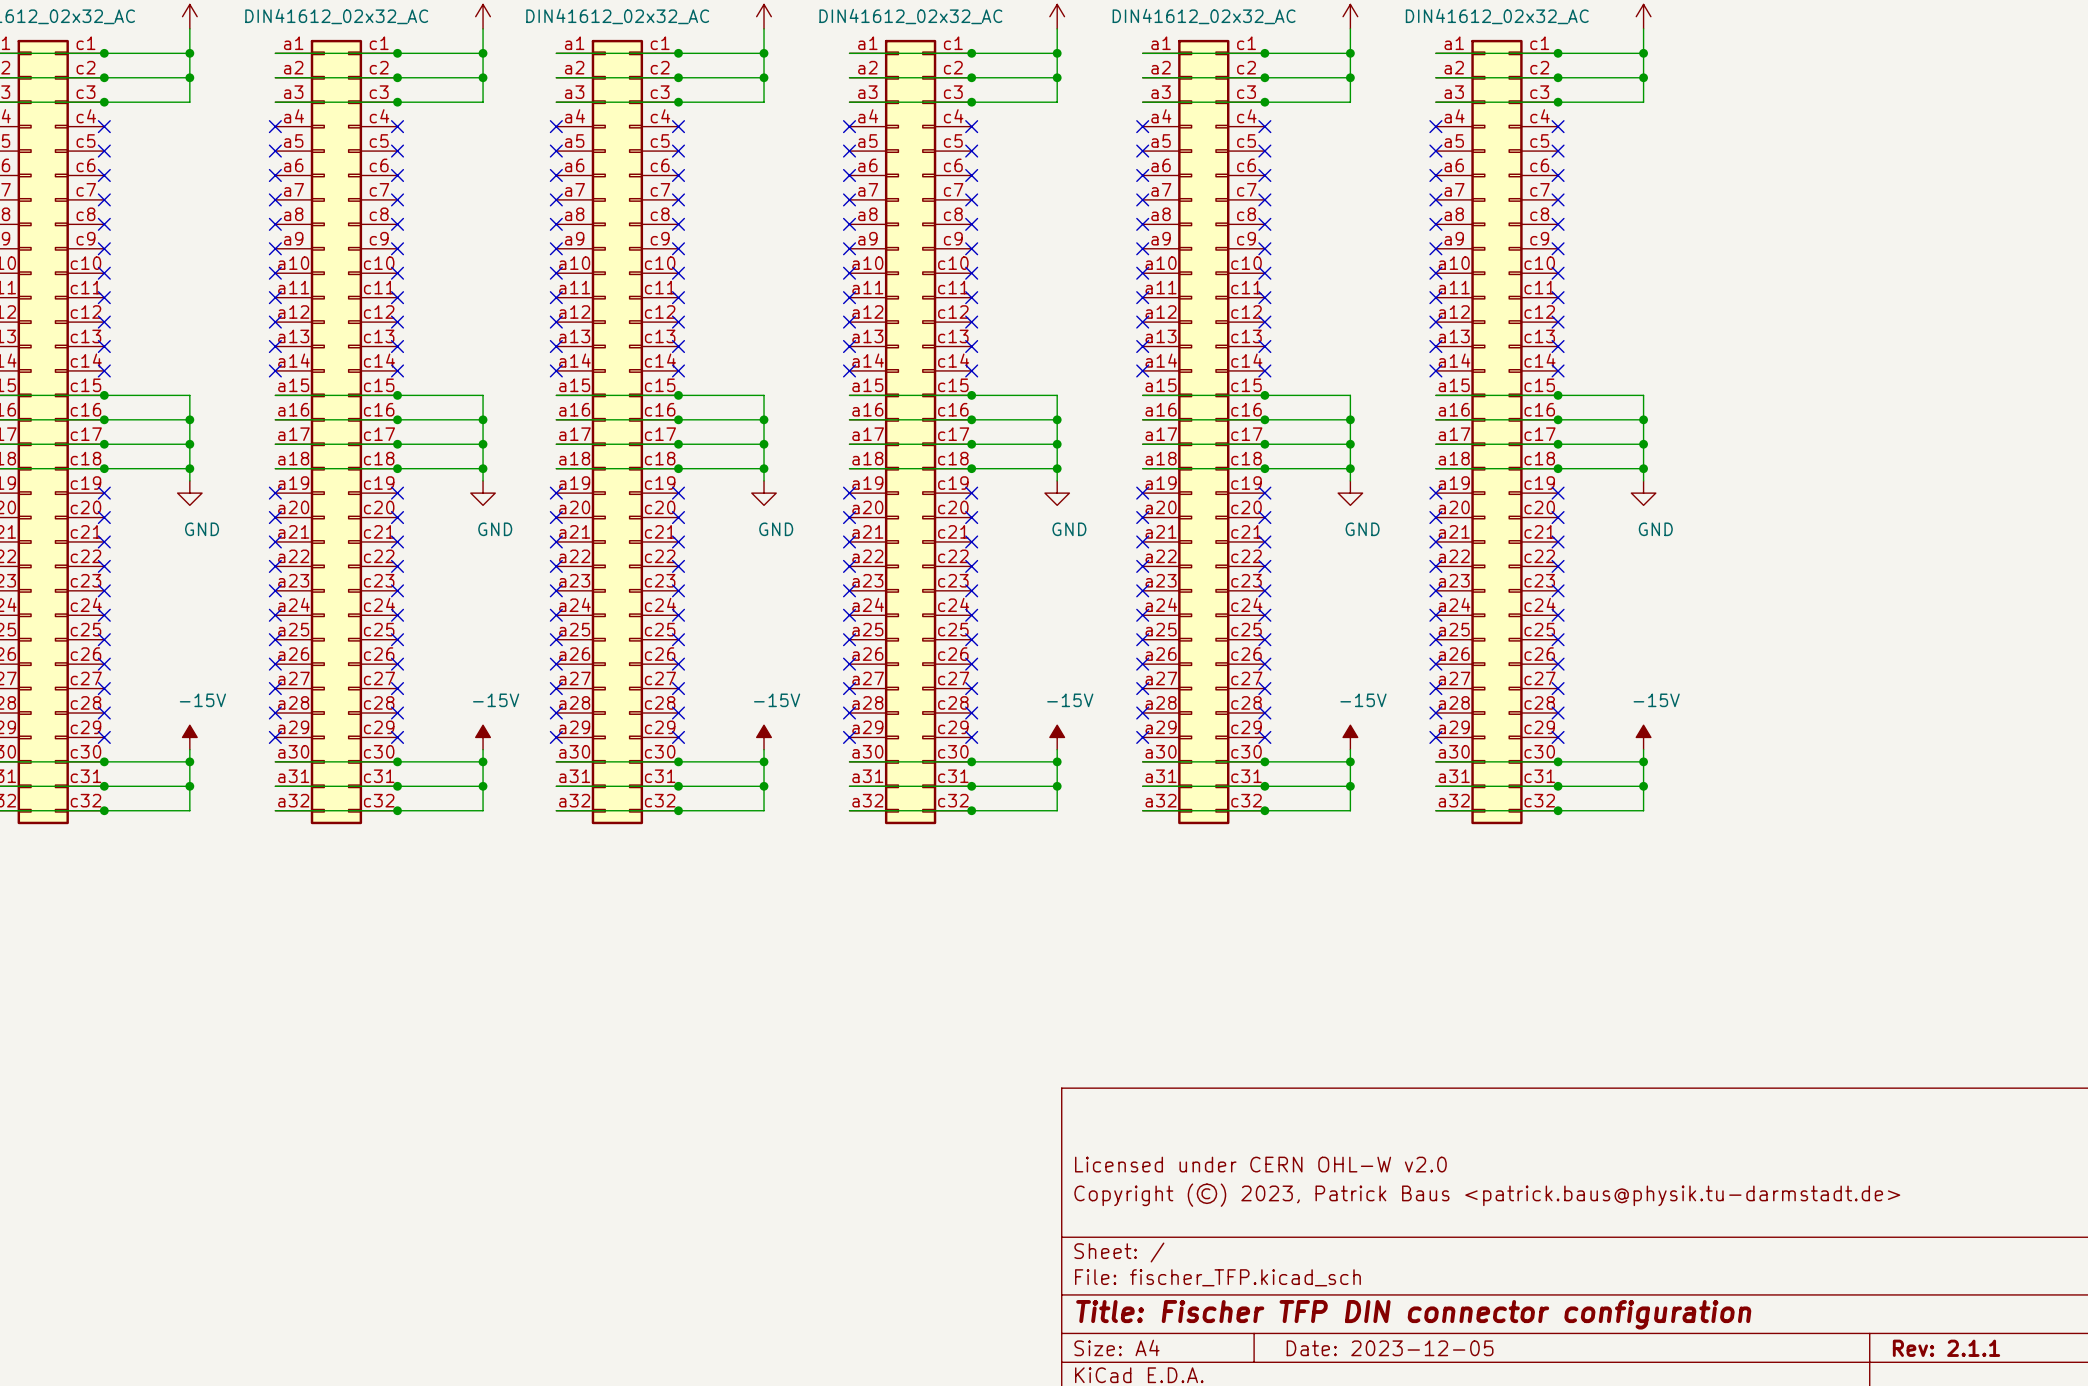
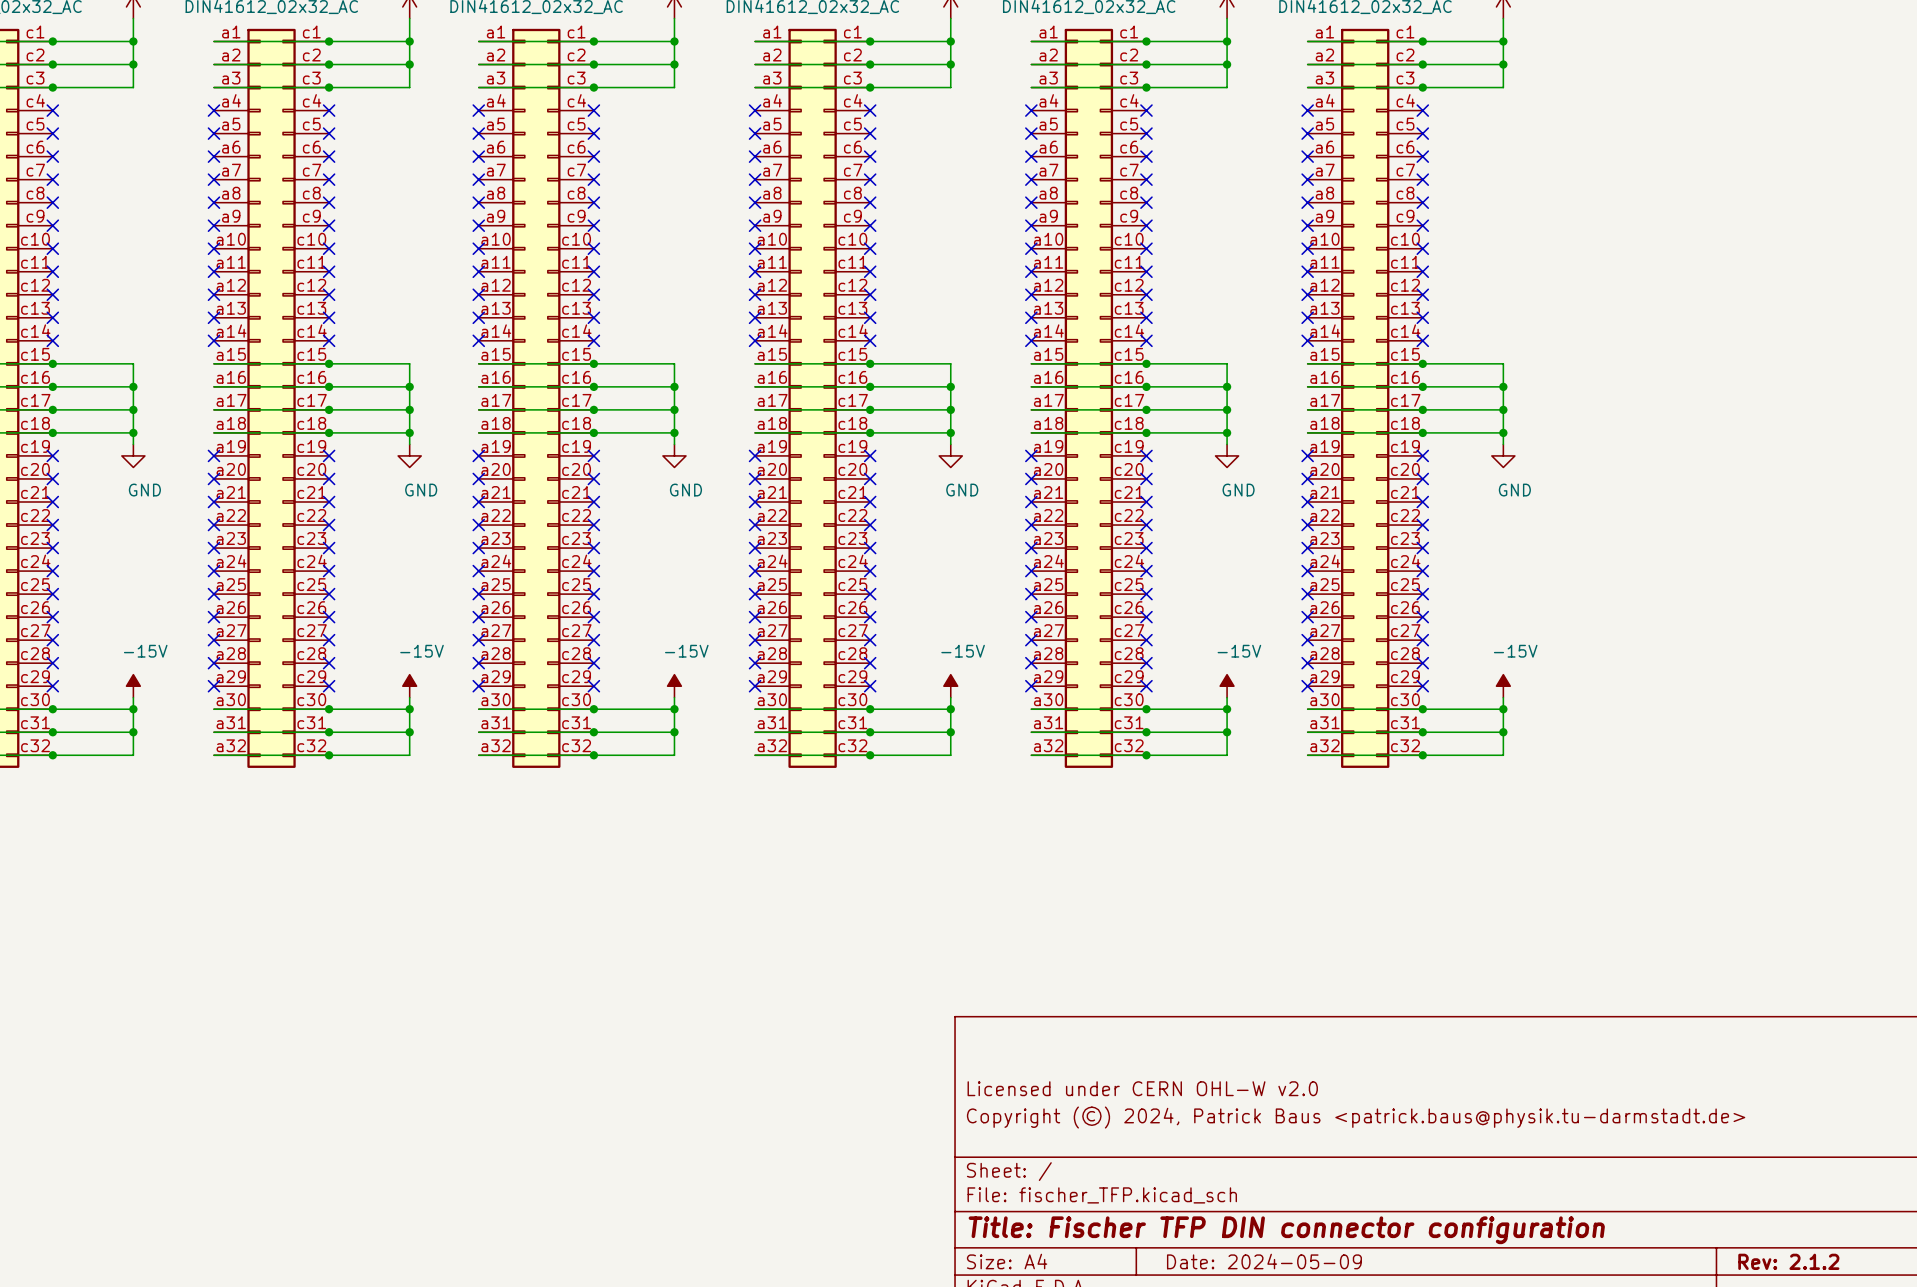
title block: Copyright (©) 2023, Patrick Baus <patrick.baus@physik.tu-darmstadt.de> (1487, 1195) -> Copyright (©) 2024, Patrick Baus <patrick.baus@physik.tu-darmstadt.de> (1356, 1117)
title block: Date: 2023-12-05 (1390, 1348) -> Date: 2024-05-09 (1264, 1261)
title block: Rev: 2.1.1 (1946, 1348) -> Rev: 2.1.2 (1788, 1261)

